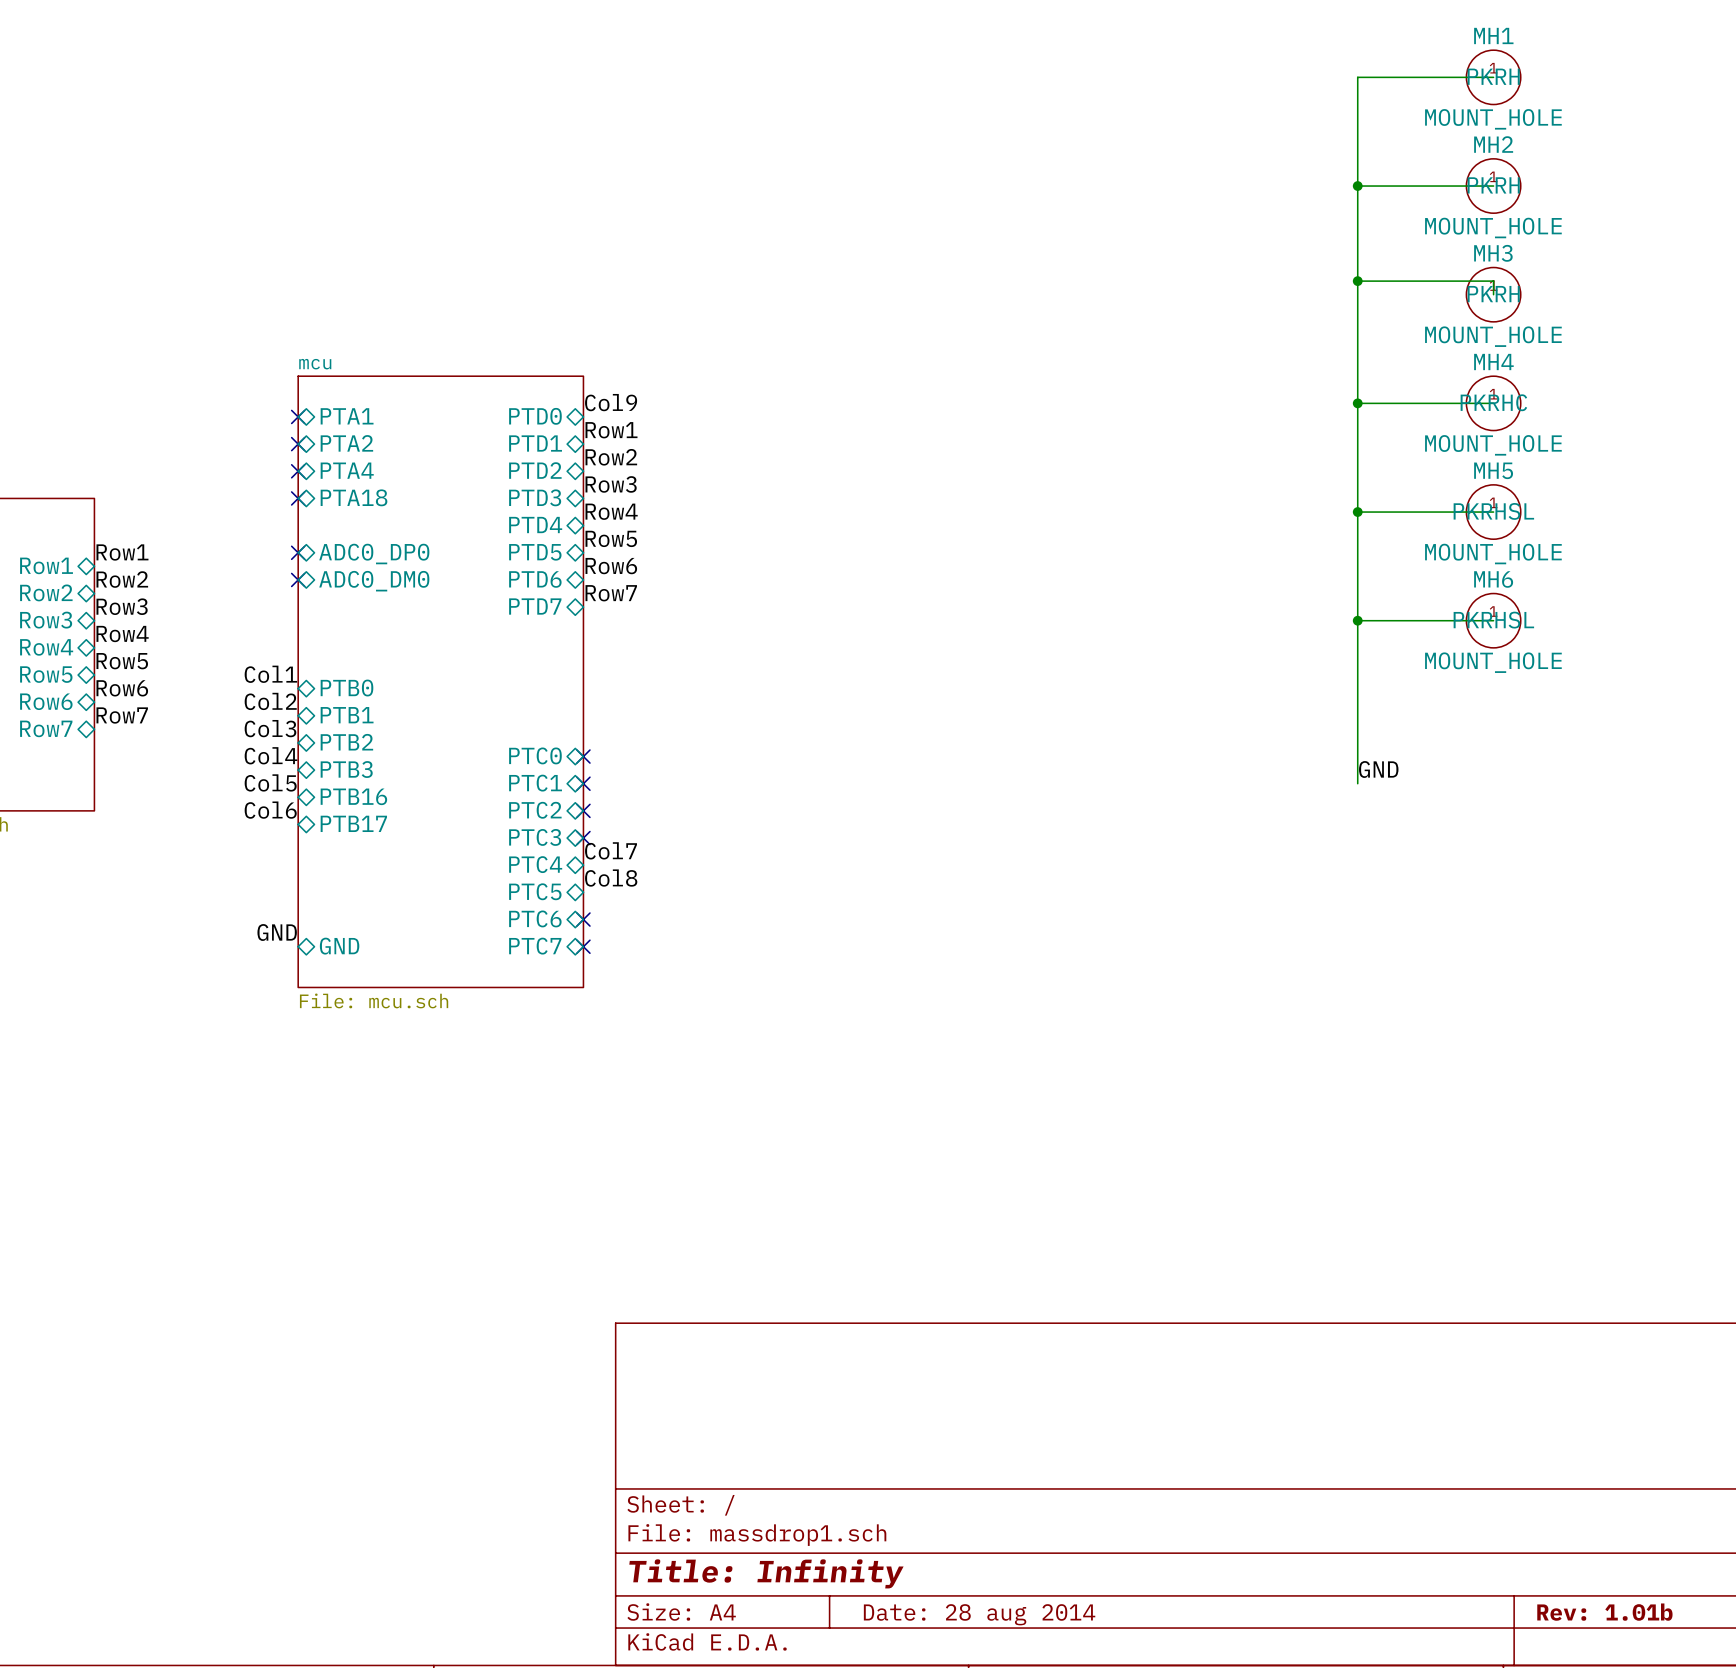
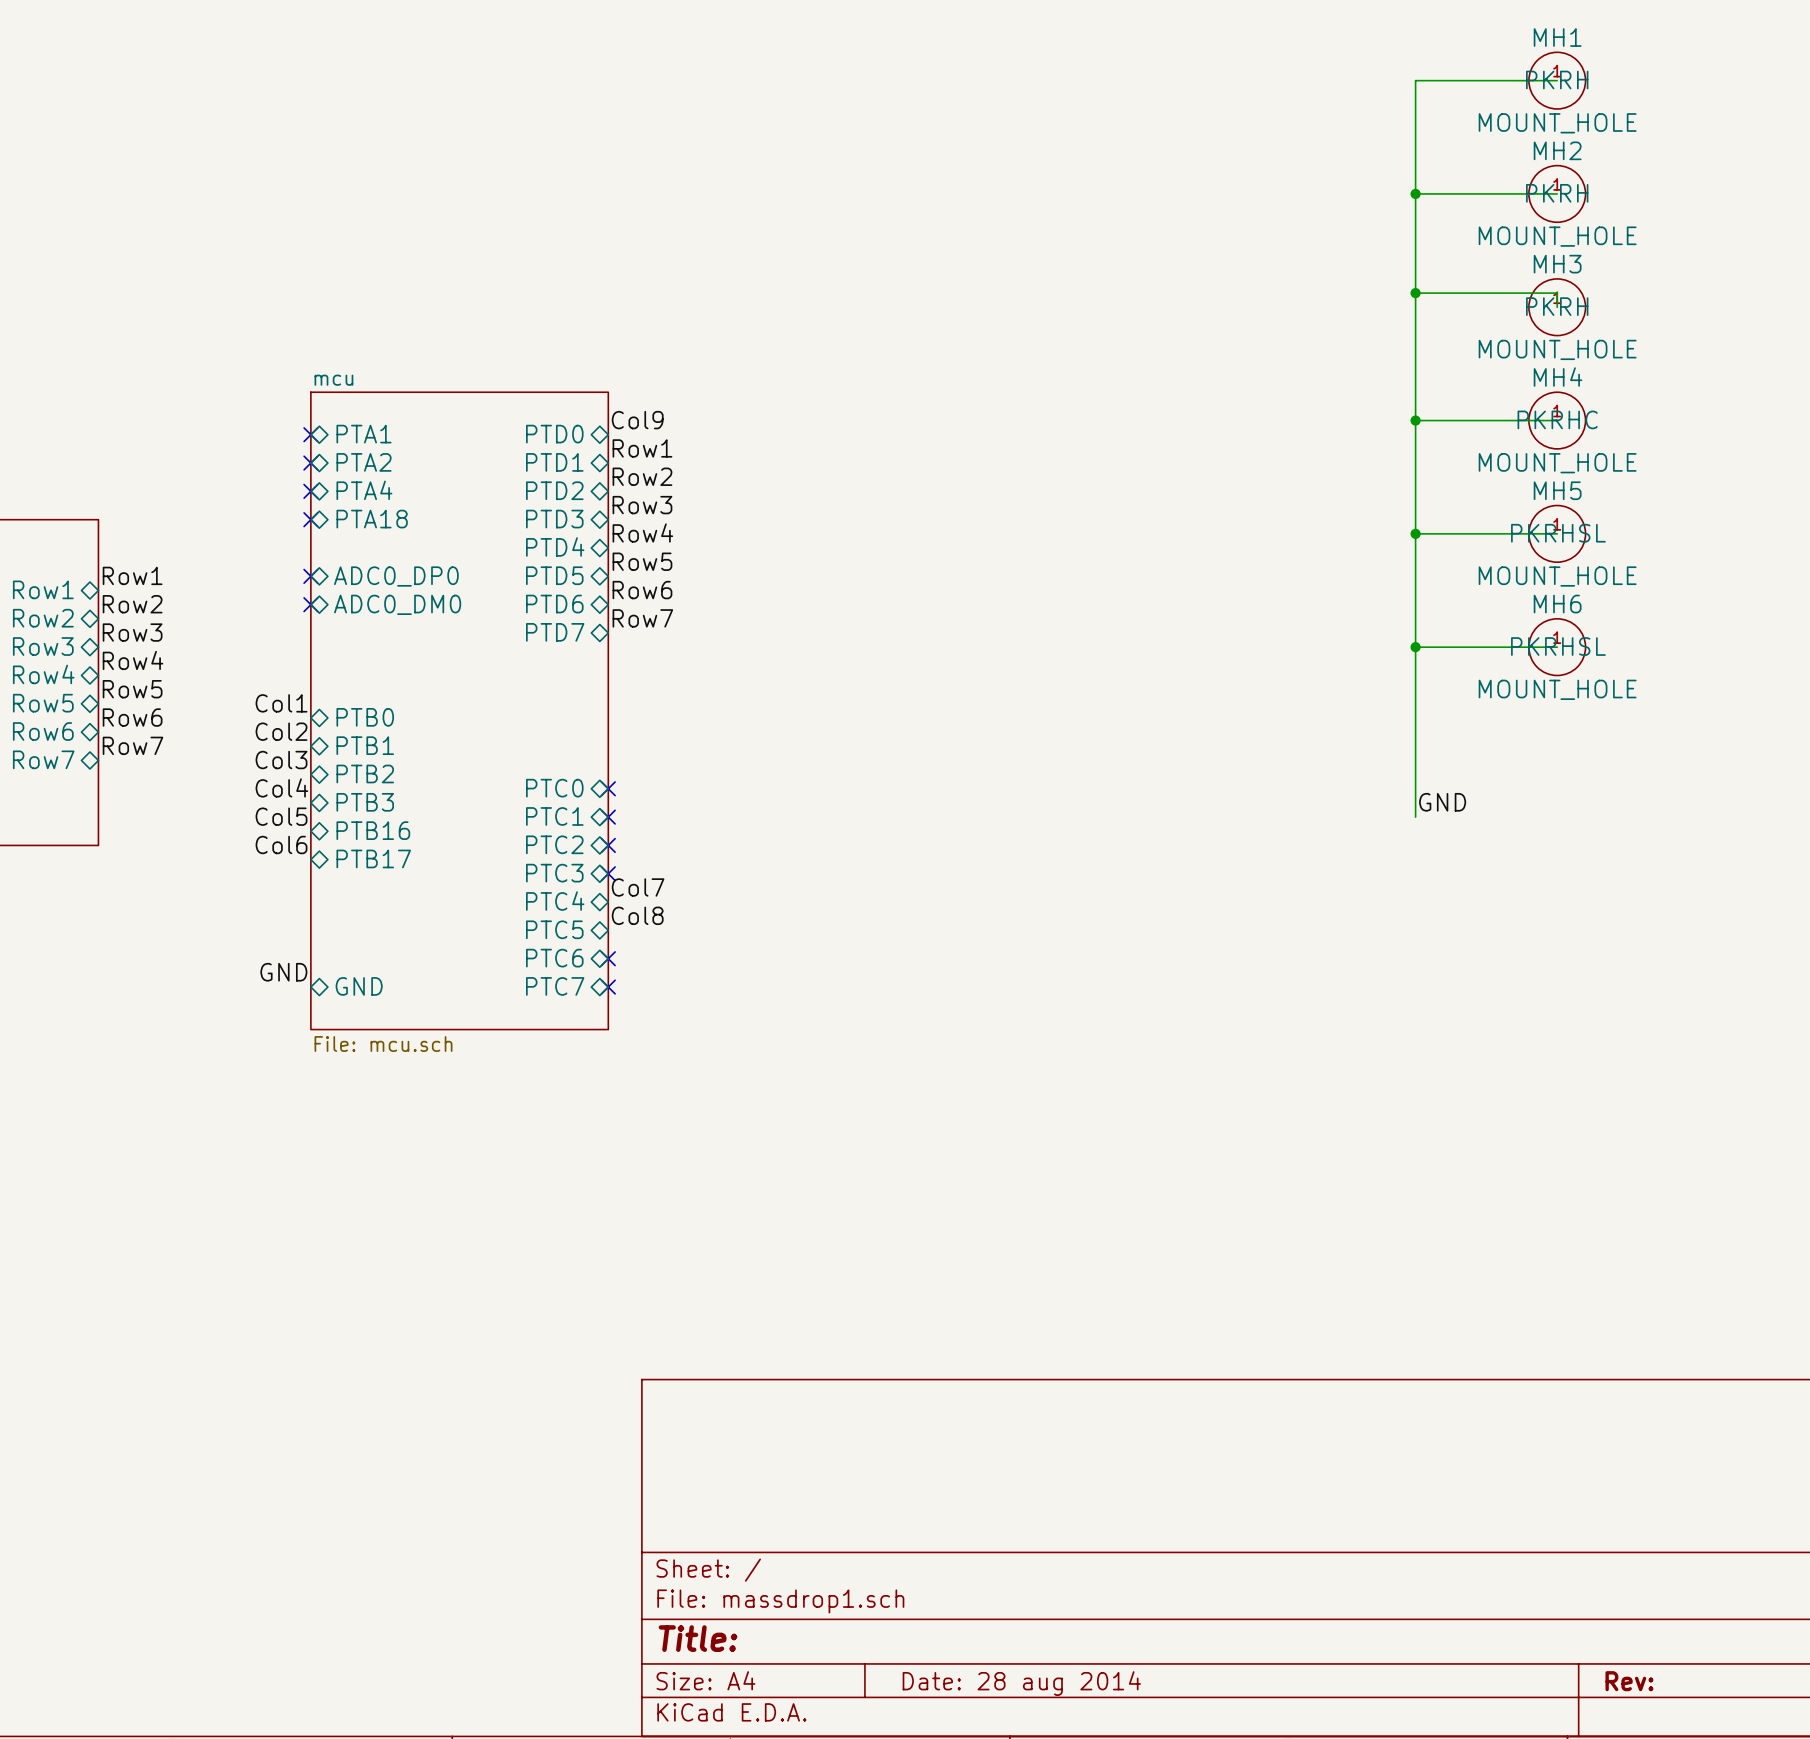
title block: Title: Infinity (766, 1573) -> Title: (698, 1638)
title block: Rev: 1.01b (1604, 1612) -> Rev: (1629, 1681)

